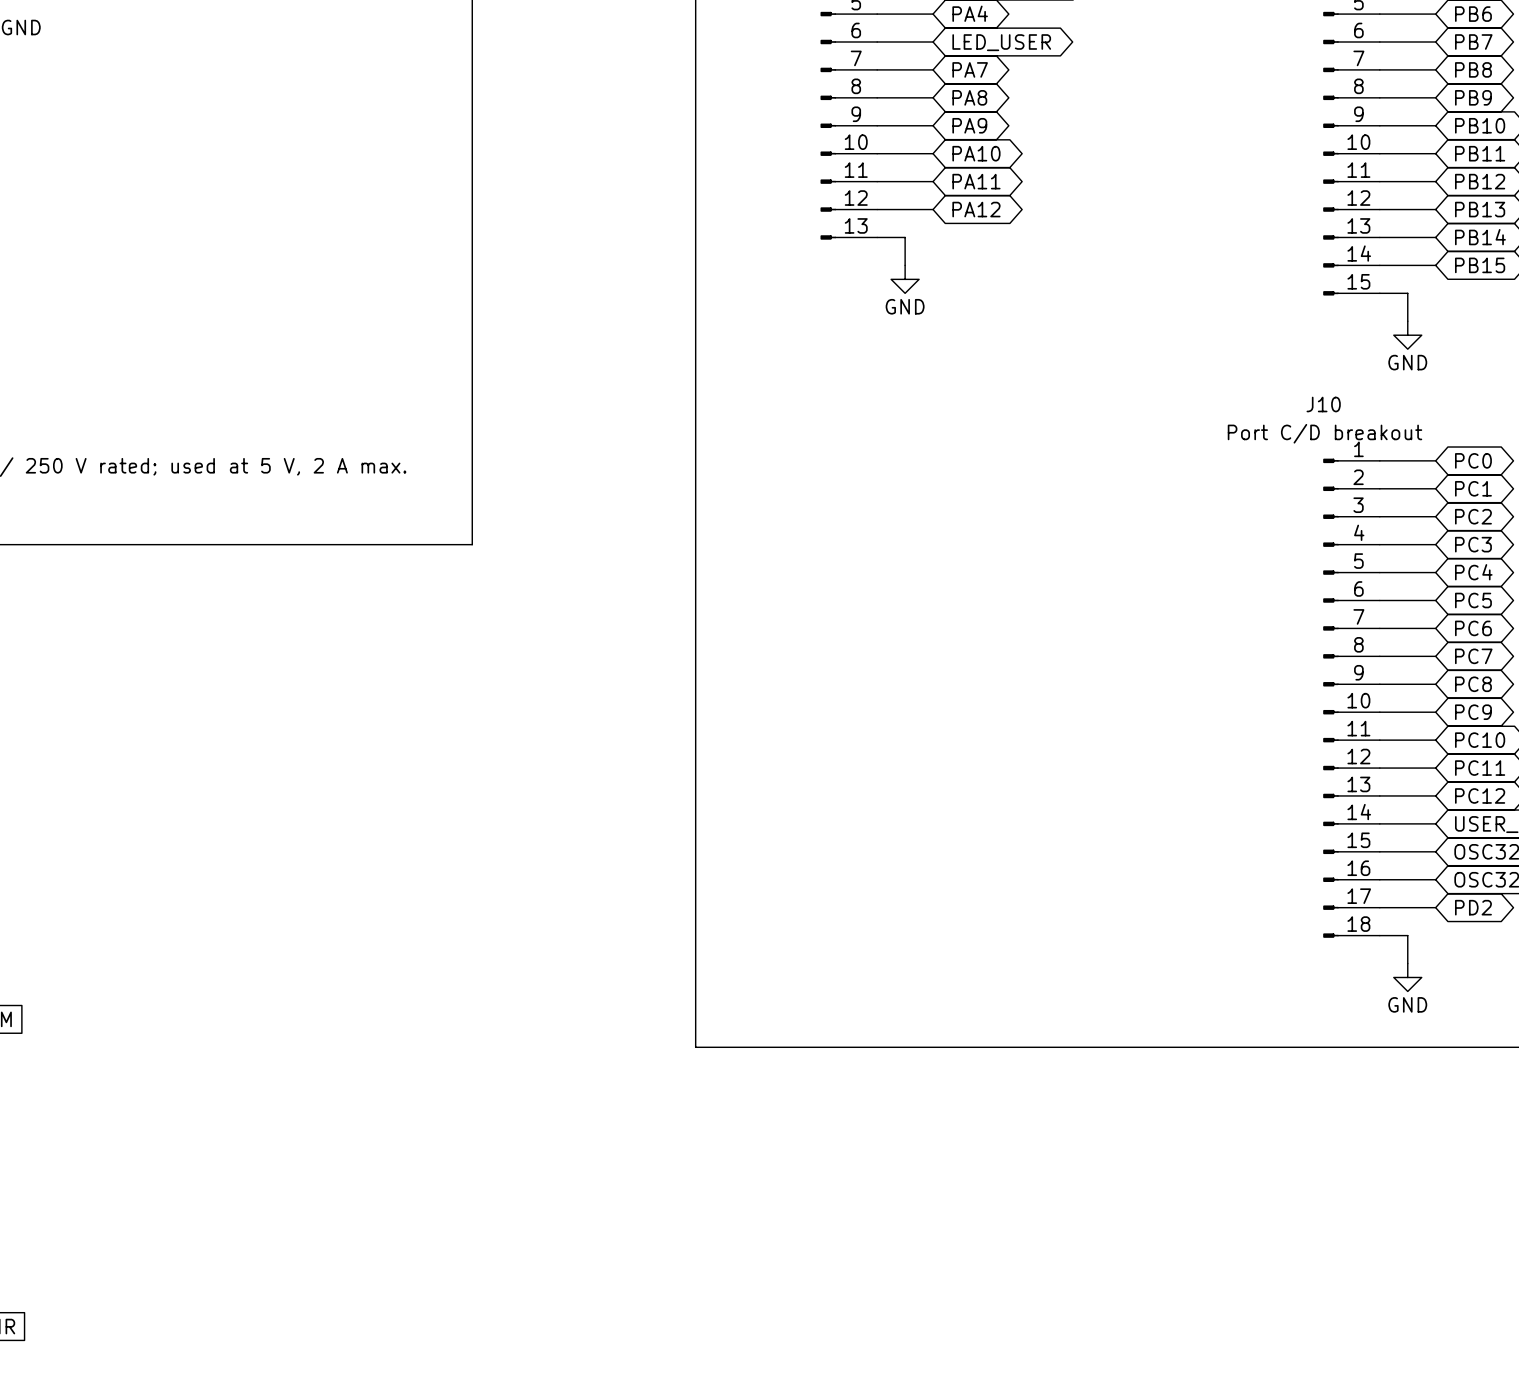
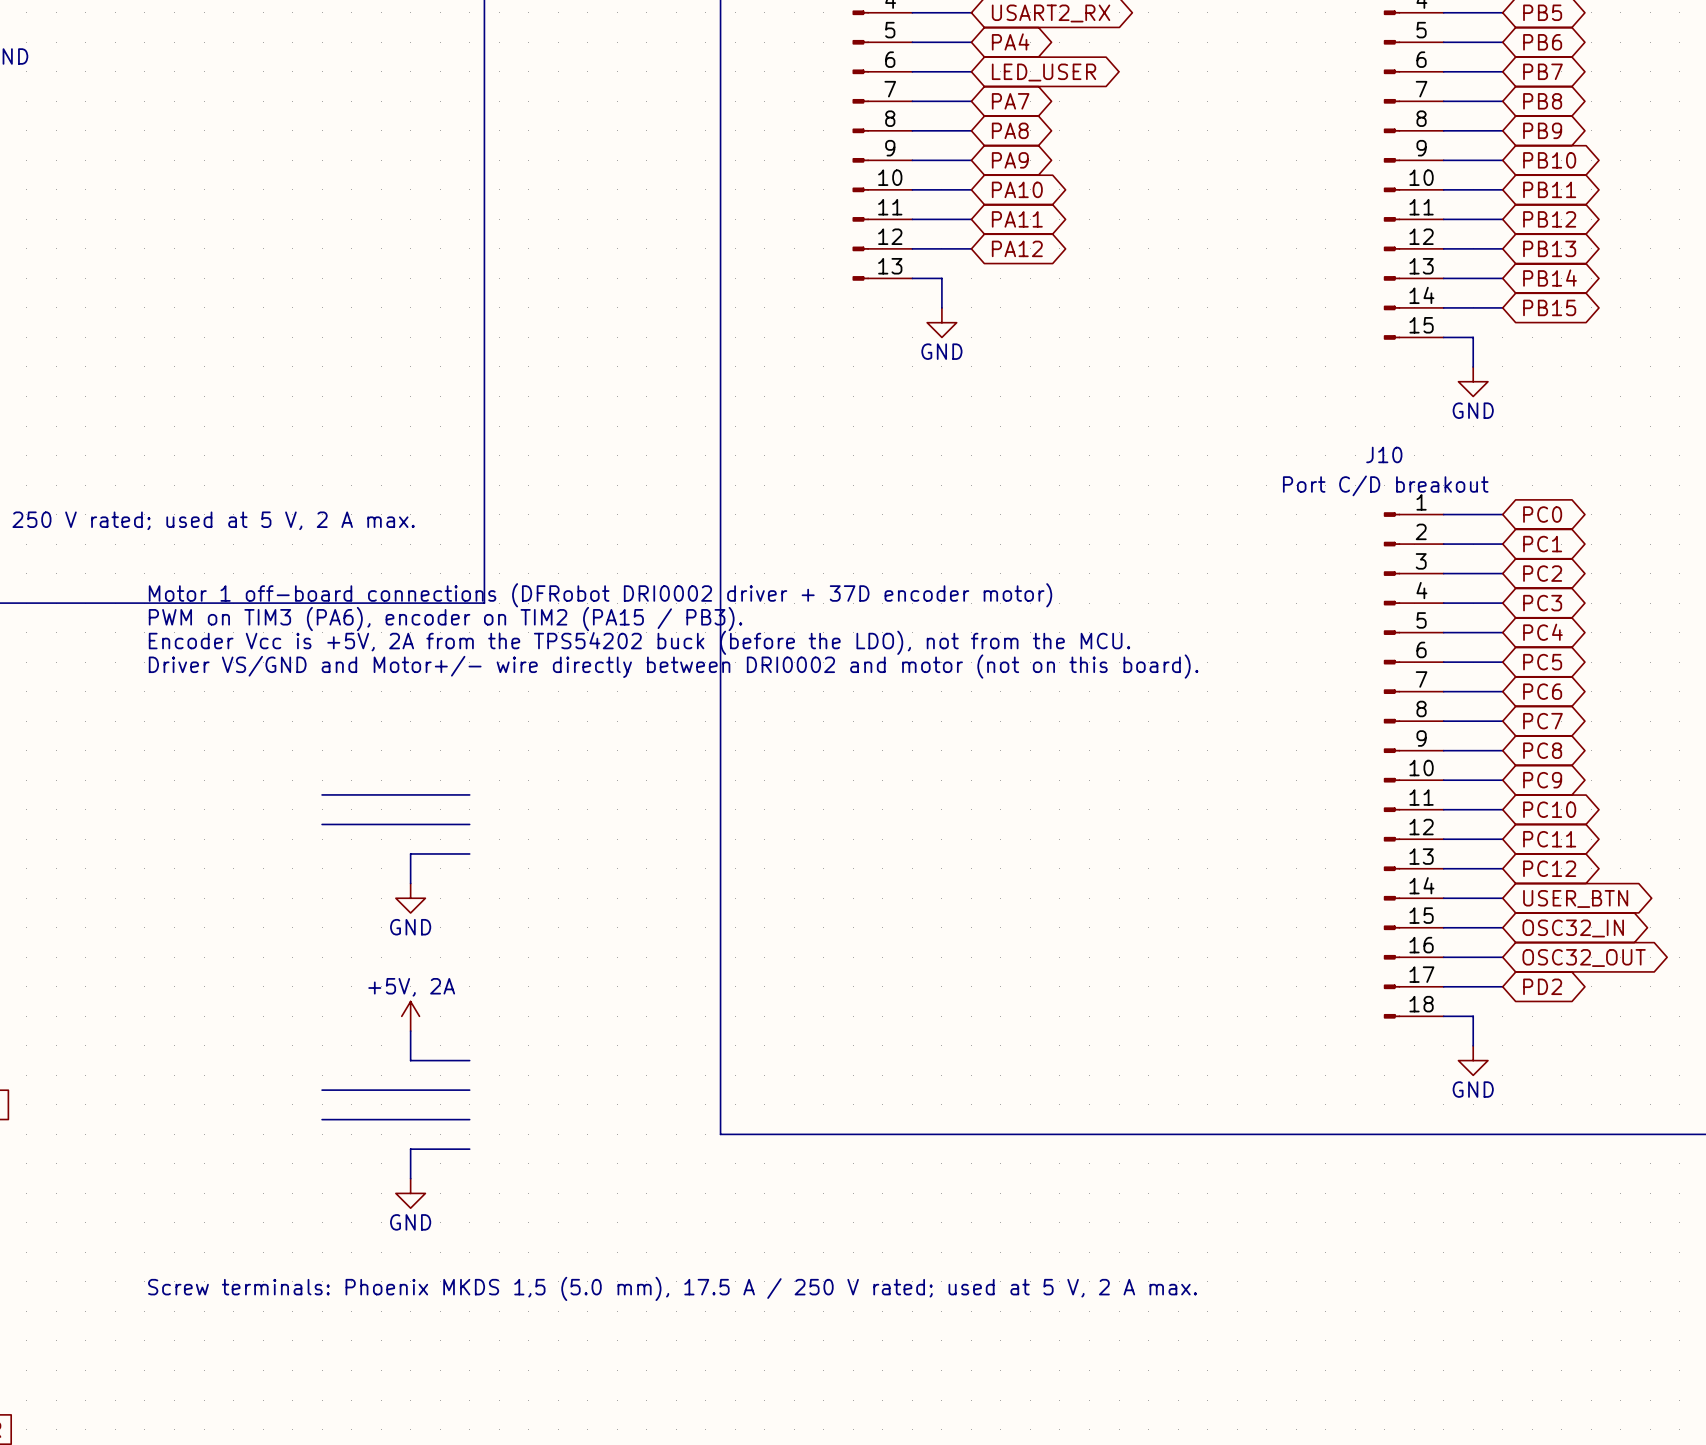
text: none -> Motor 1 off-board connections (DFRobot DRI0002 driver + 37D encoder motor) (600, 595)
text: none -> PWM on TIM3 (PA6), encoder on TIM2 (PA15 / PB3). (445, 619)
text: none -> Encoder Vcc is +5V, 2A from the TPS54202 buck (before the LDO), not from the MCU. (639, 642)
text: none -> Driver VS/GND and Motor+/- wire directly between DRI0002 and motor (not on this board). (673, 666)
wire: none -> (322, 794) (469, 794)
wire: none -> (322, 824) (469, 824)
wire: none -> (469, 853) (410, 853) (410, 883)
power symbol: none -> GND (410, 898)
power symbol: none -> +5V, 2A (410, 1016)
wire: none -> (410, 1031) (410, 1060) (469, 1060)
wire: none -> (322, 1090) (469, 1090)
wire: none -> (322, 1119) (469, 1119)
wire: none -> (469, 1149) (410, 1149) (410, 1178)
power symbol: none -> GND (410, 1193)
text: none -> Screw terminals: Phoenix MKDS 1,5 (5.0 mm), 17.5 A / 250 V rated; used at 5 V, 2 A max. (672, 1288)

